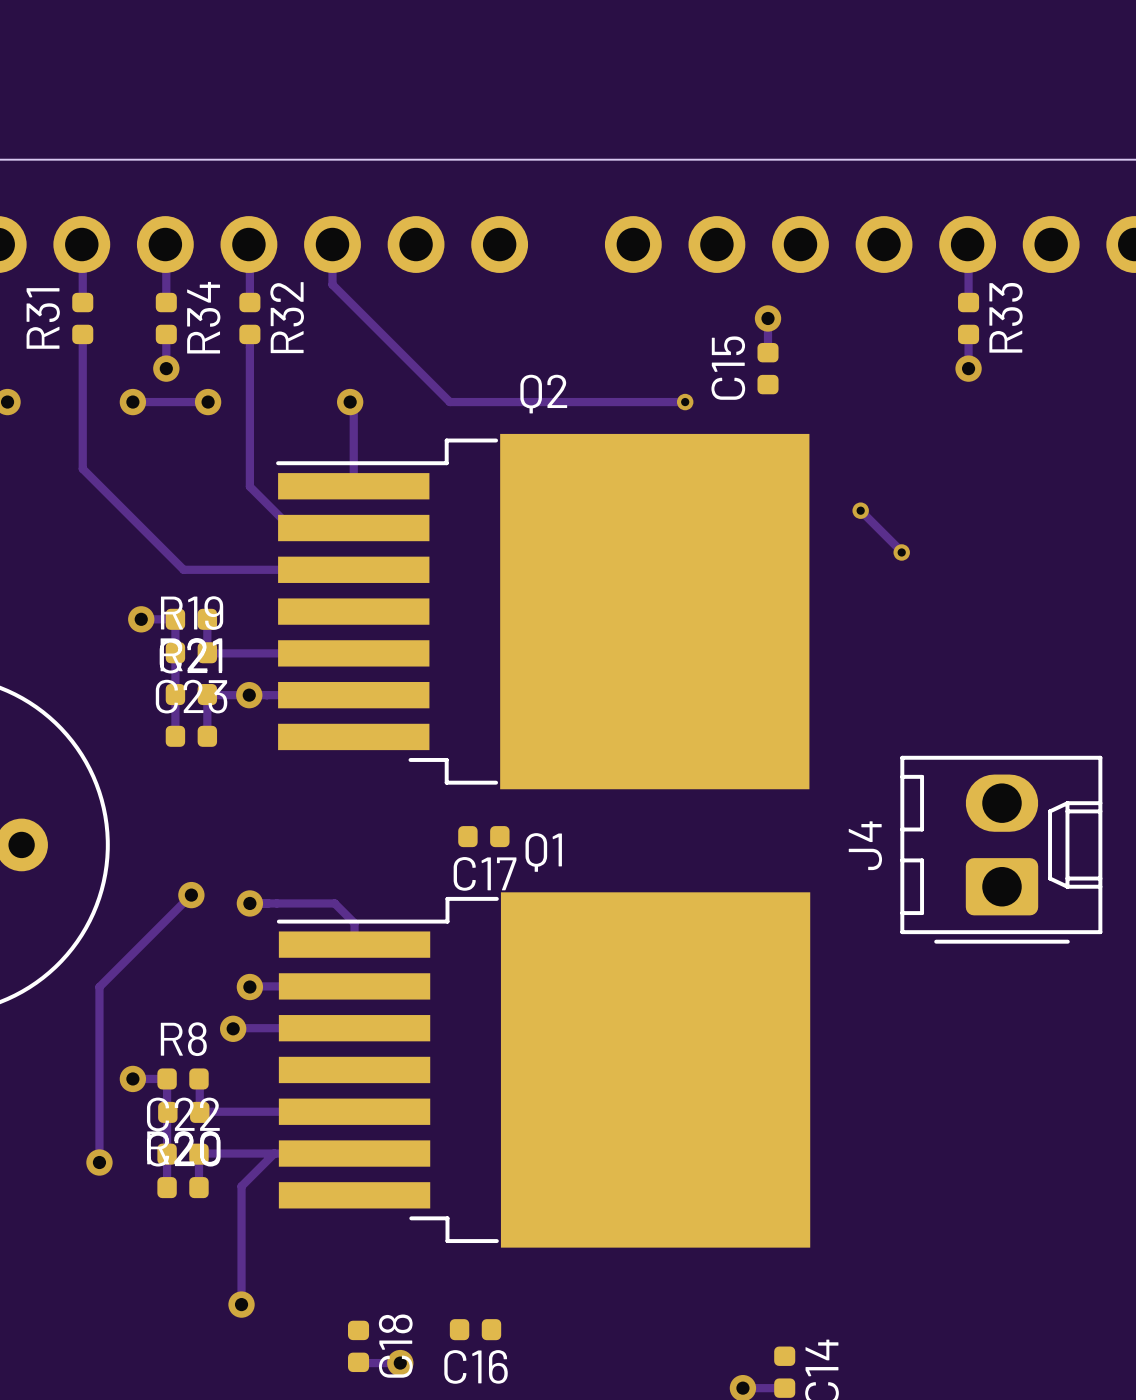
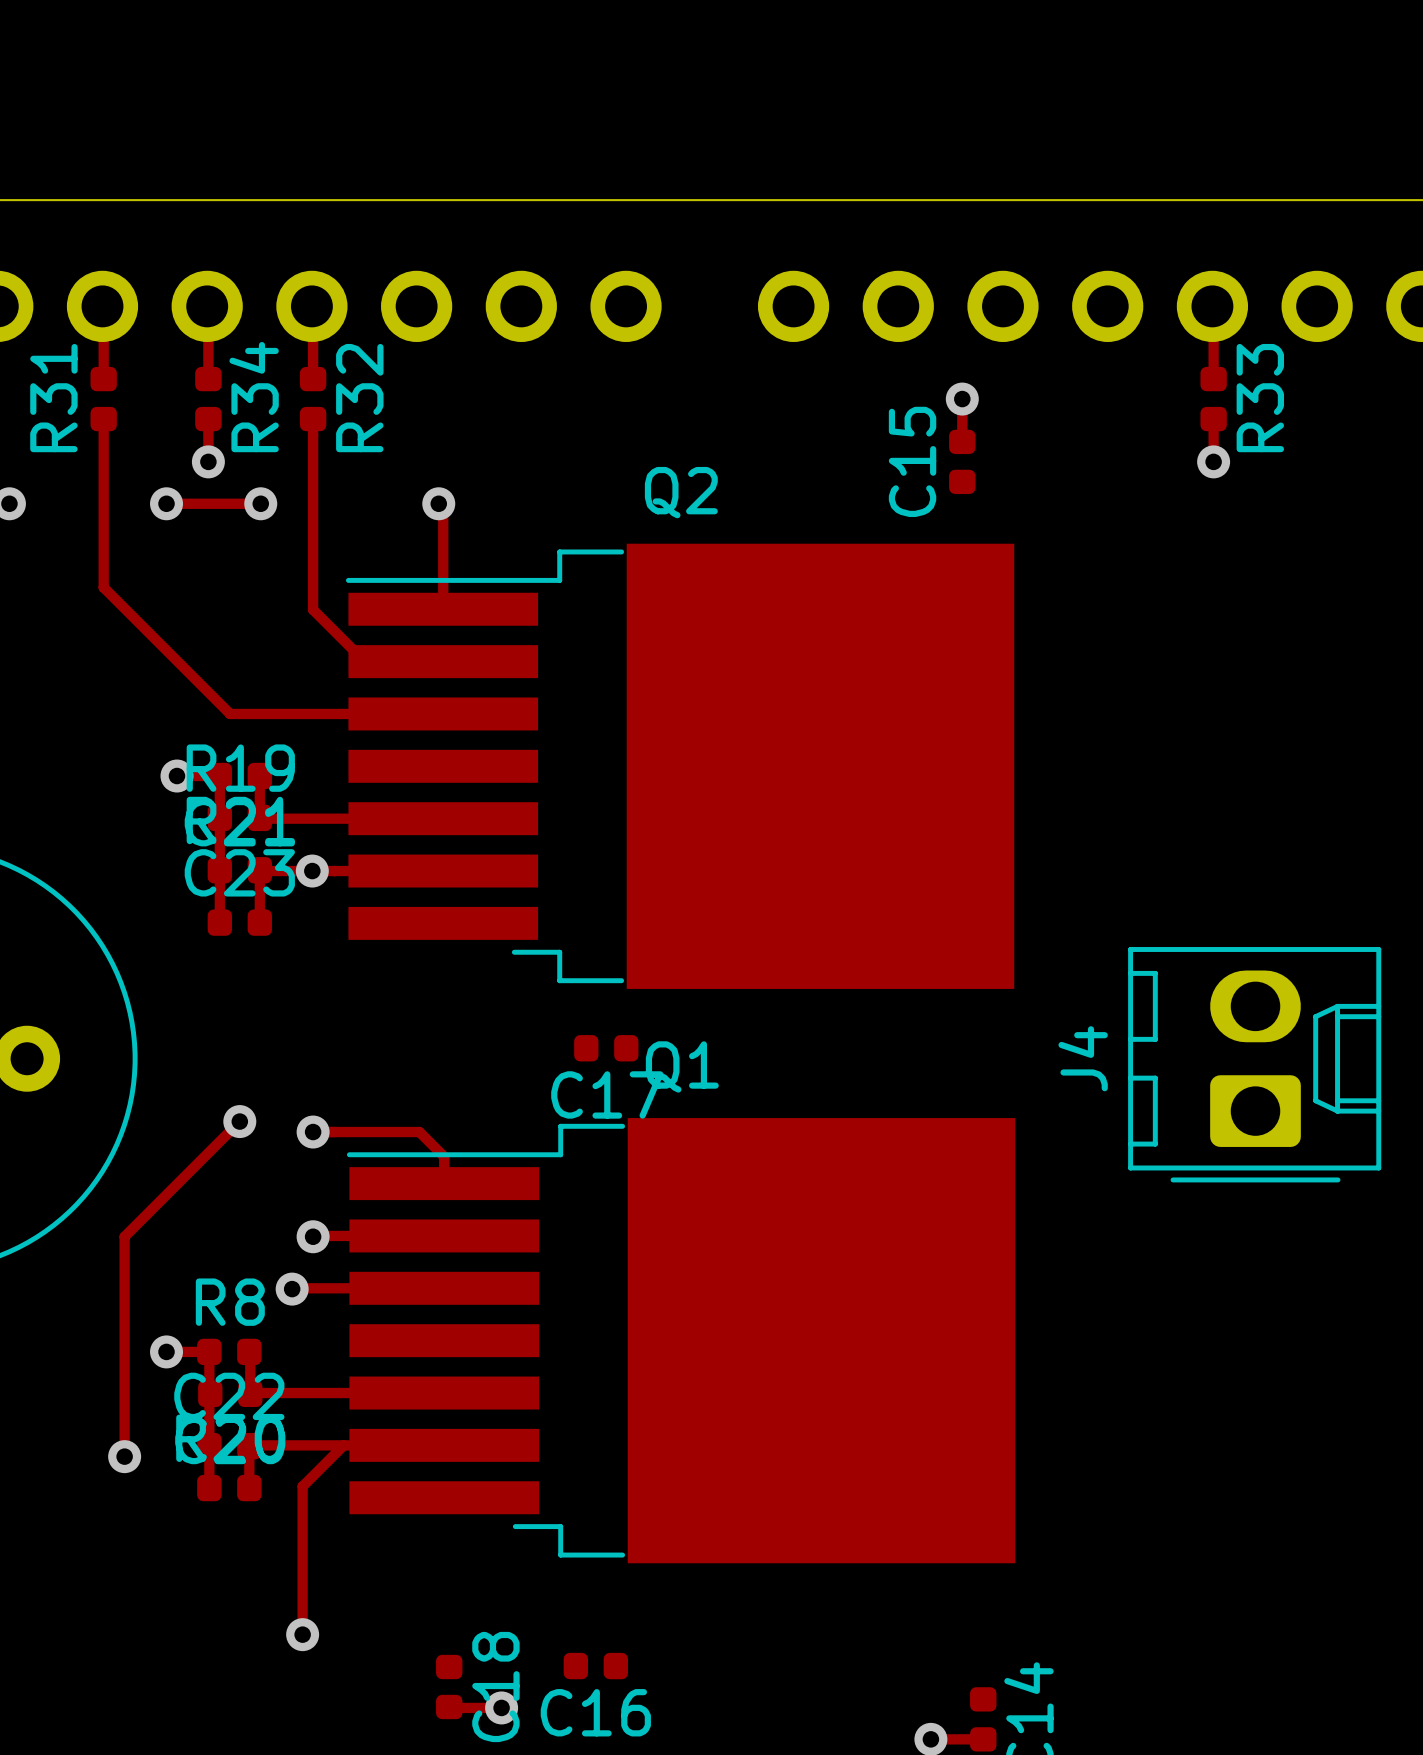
track: (332, 244) (332, 284) (449, 402) (684, 402) -> none
via: (685, 402) -> none
track: (860, 510) (902, 552) -> none
via: (860, 510) -> none
via: (901, 552) -> none

